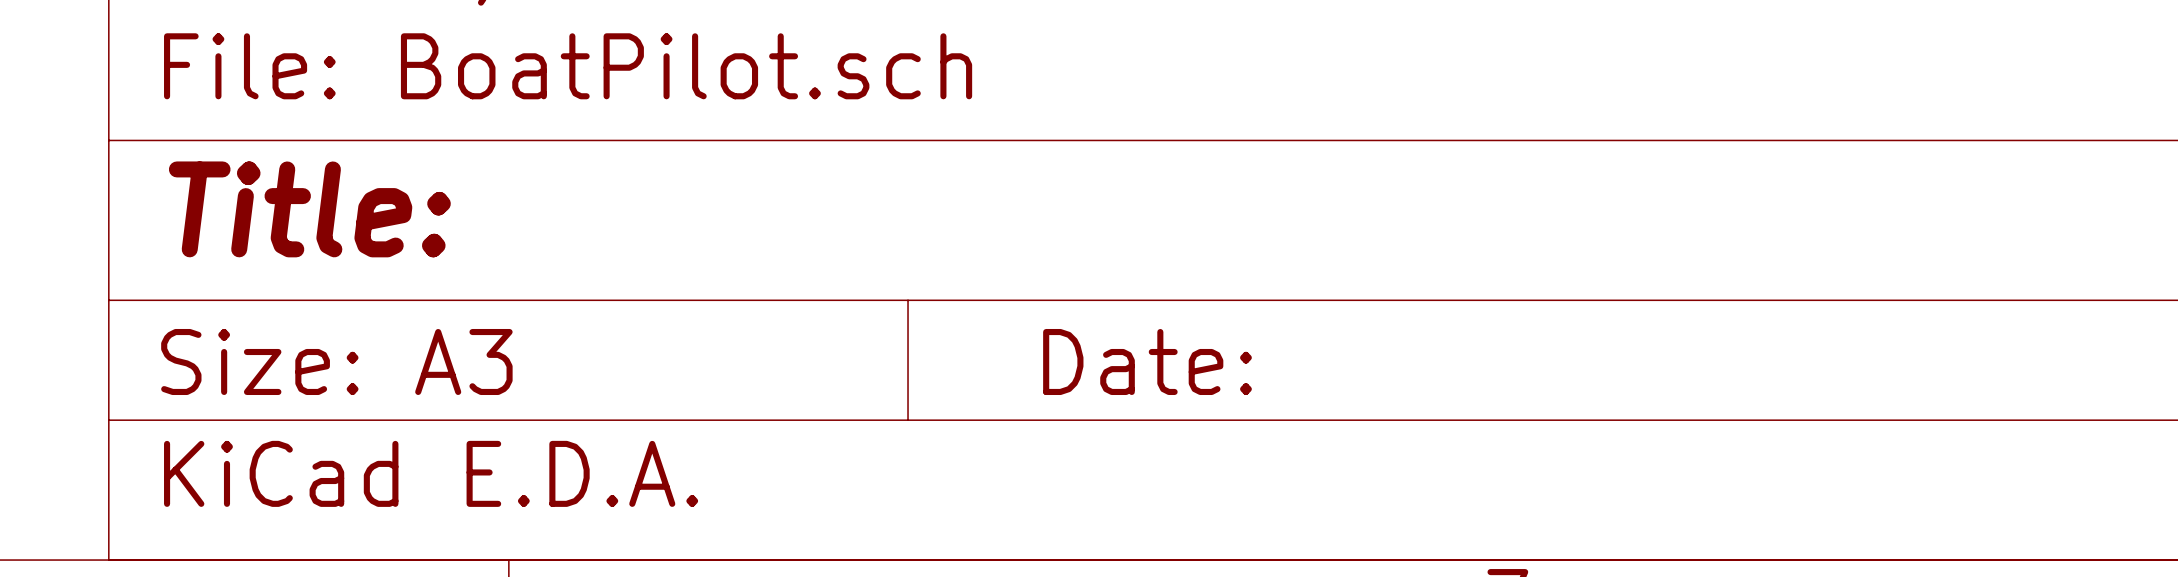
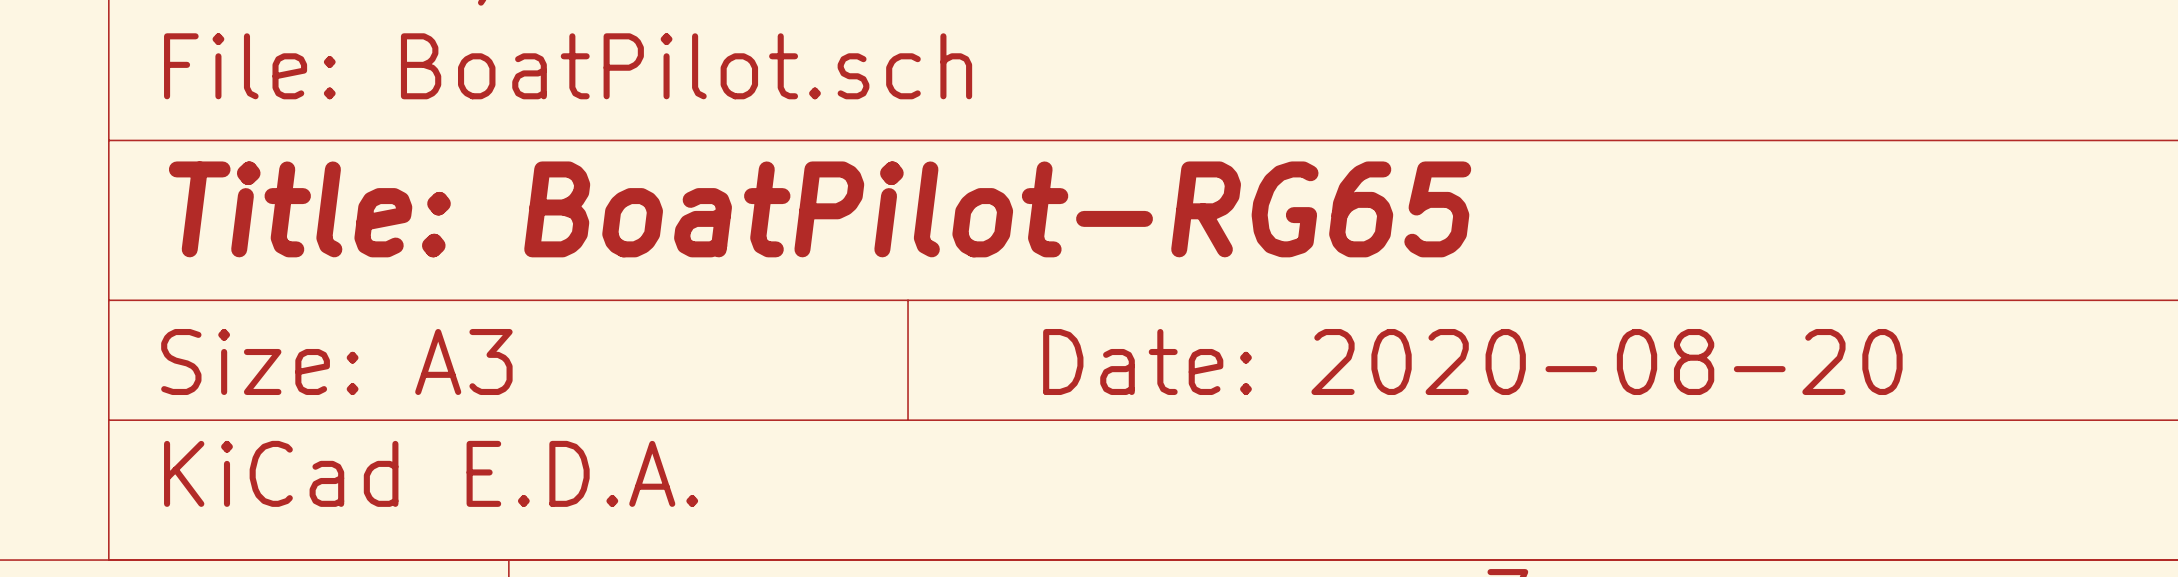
title block: Title: (309, 209) -> Title: BoatPilot-RG65 (820, 209)
title block: Date: (1147, 361) -> Date: 2020-08-20 (1472, 361)

